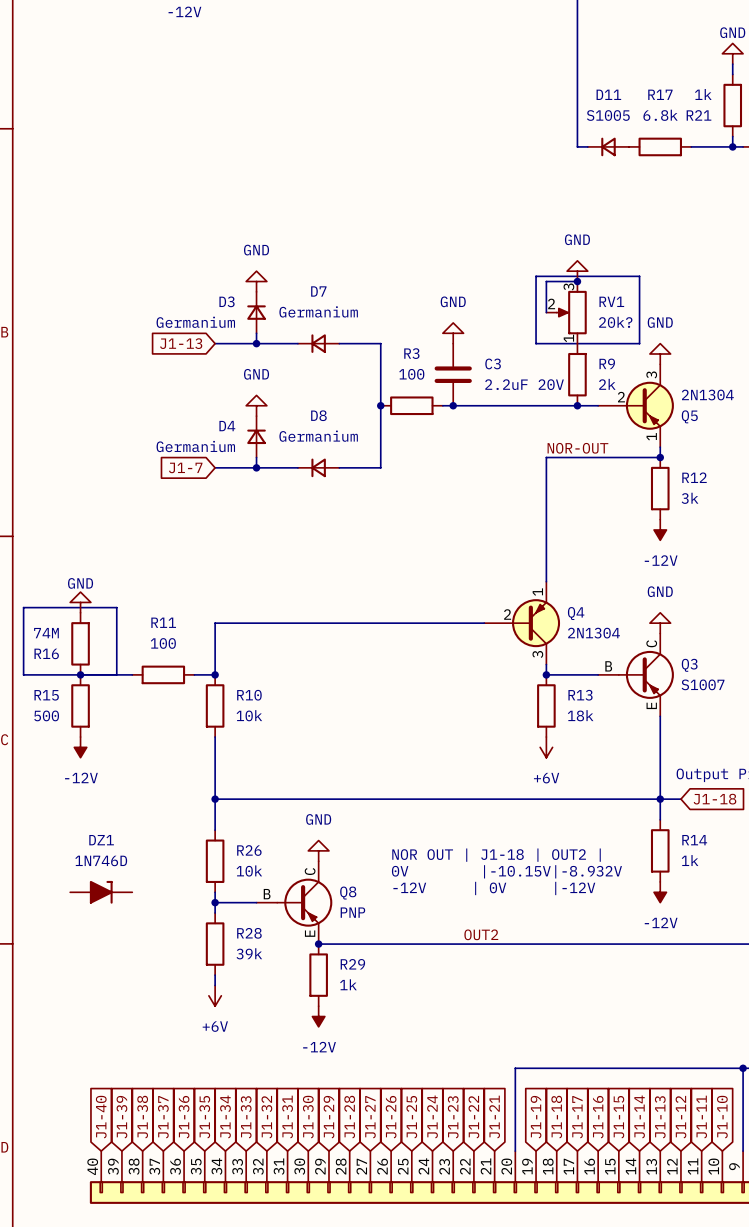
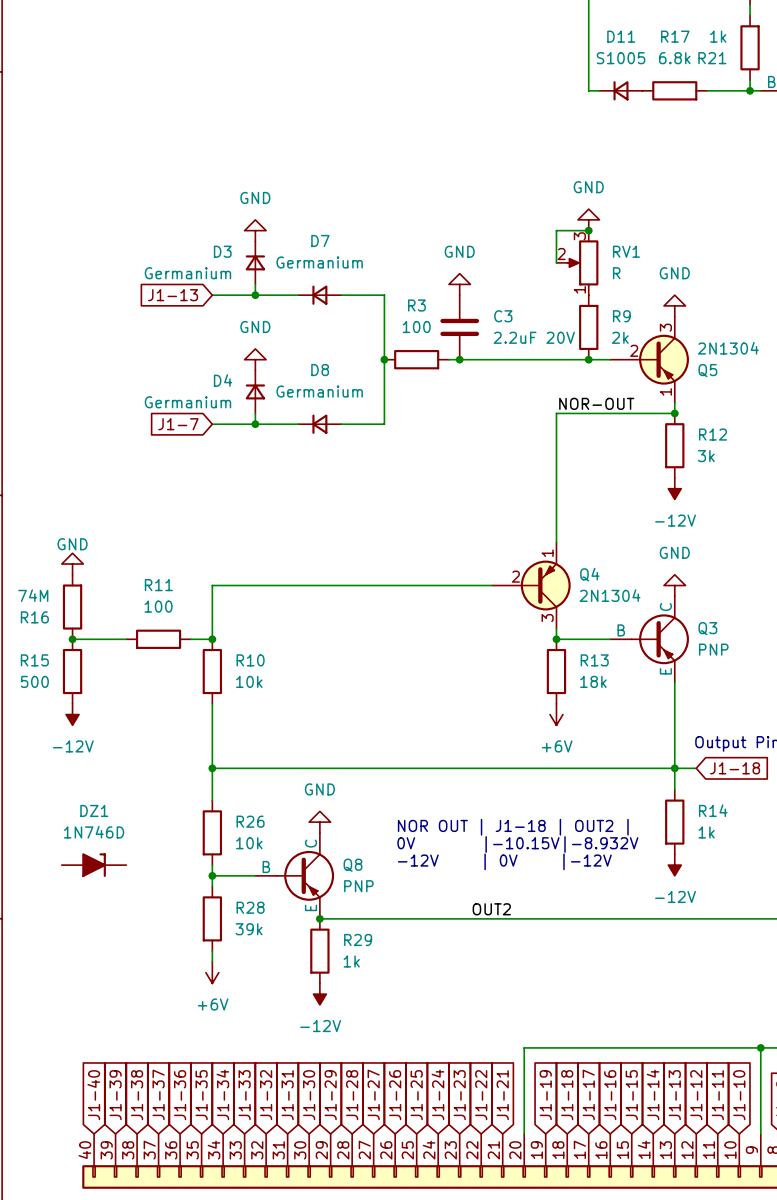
line: (536, 276) (639, 276) (639, 343) (536, 343) (536, 276) -> none
RV1 value: 20k? (615, 322) -> R (616, 273)
line: (23, 607) (116, 607) (116, 674) (23, 674) (23, 607) -> none
Q3 value: S1007 (703, 684) -> PNP (713, 649)

